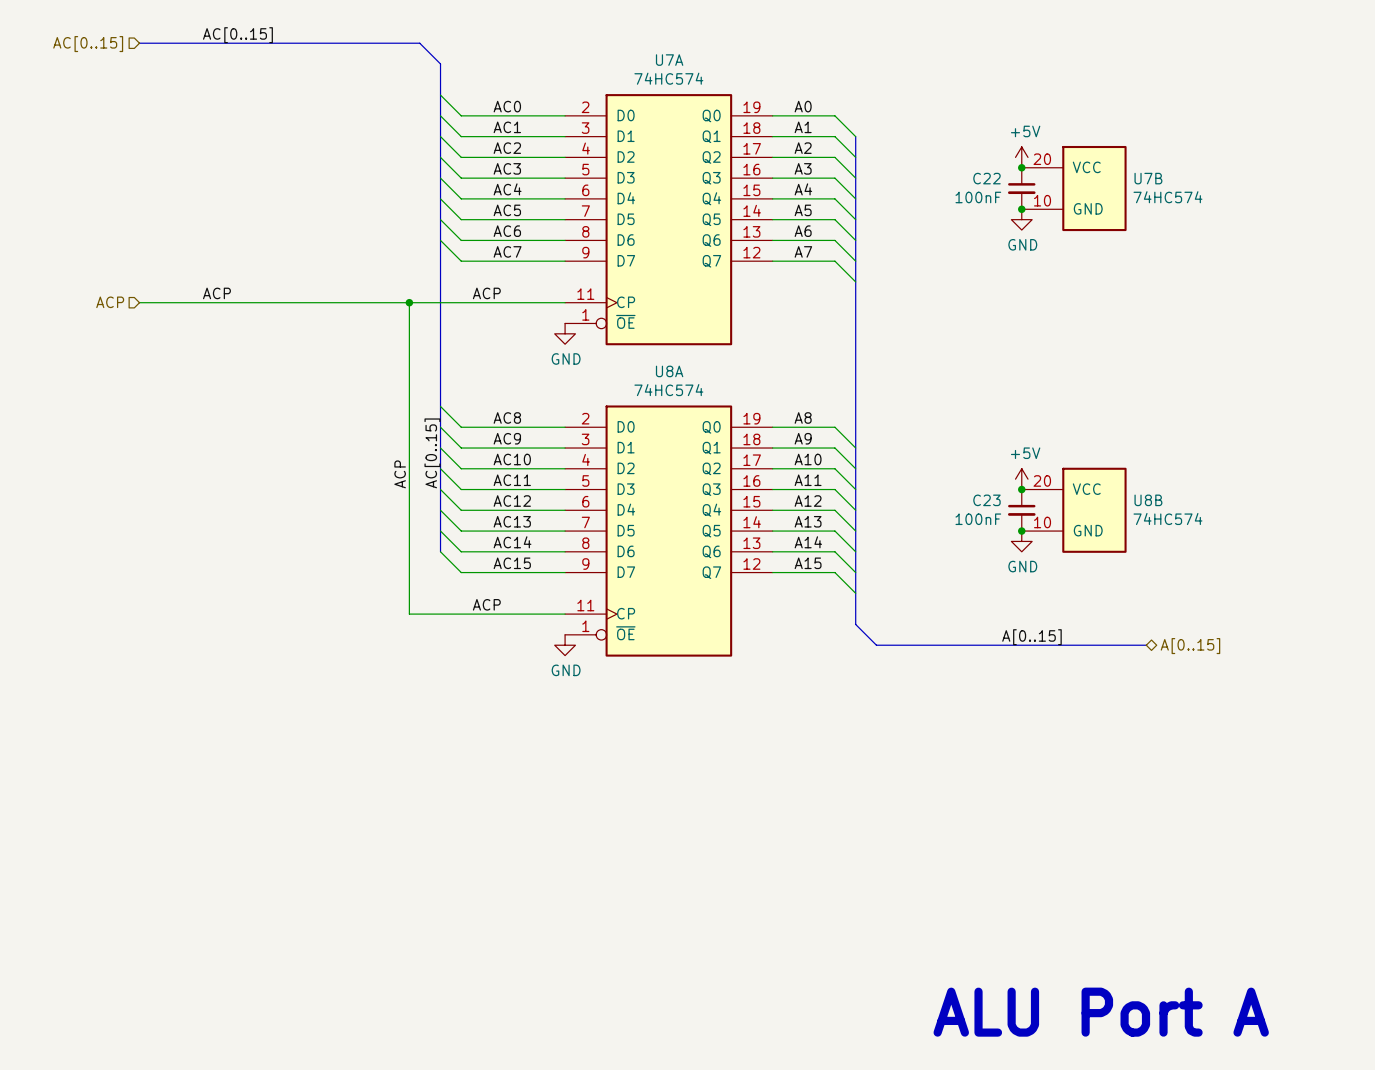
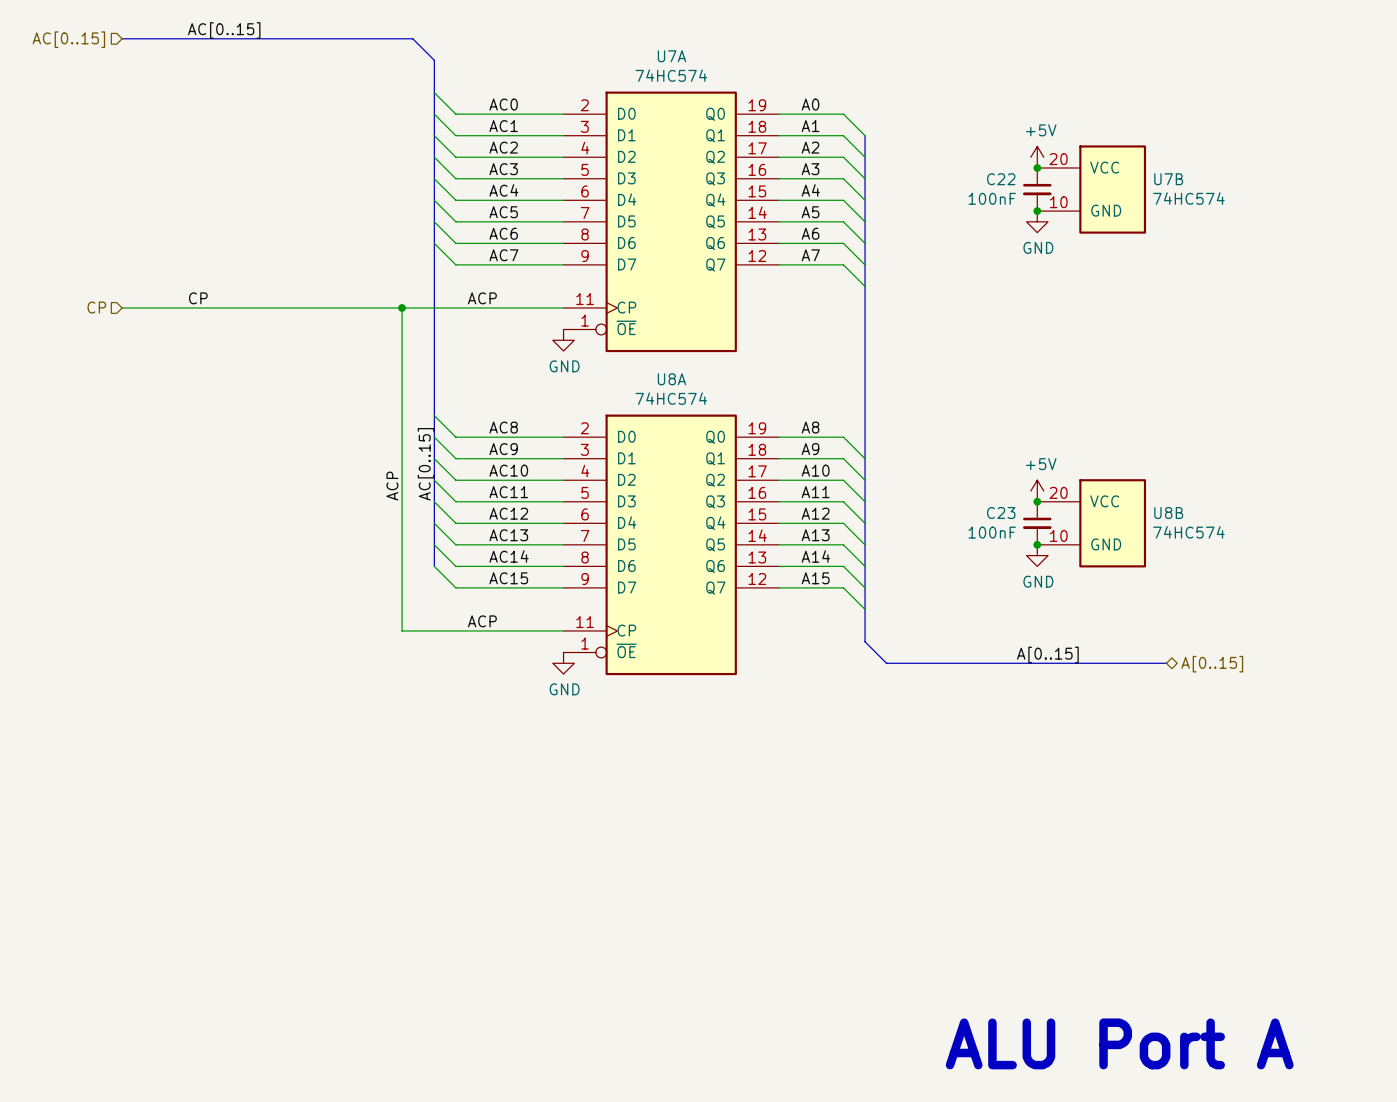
label: ACP (216, 293) -> CP (198, 298)
hierarchical label: ACP (110, 302) -> CP (96, 307)

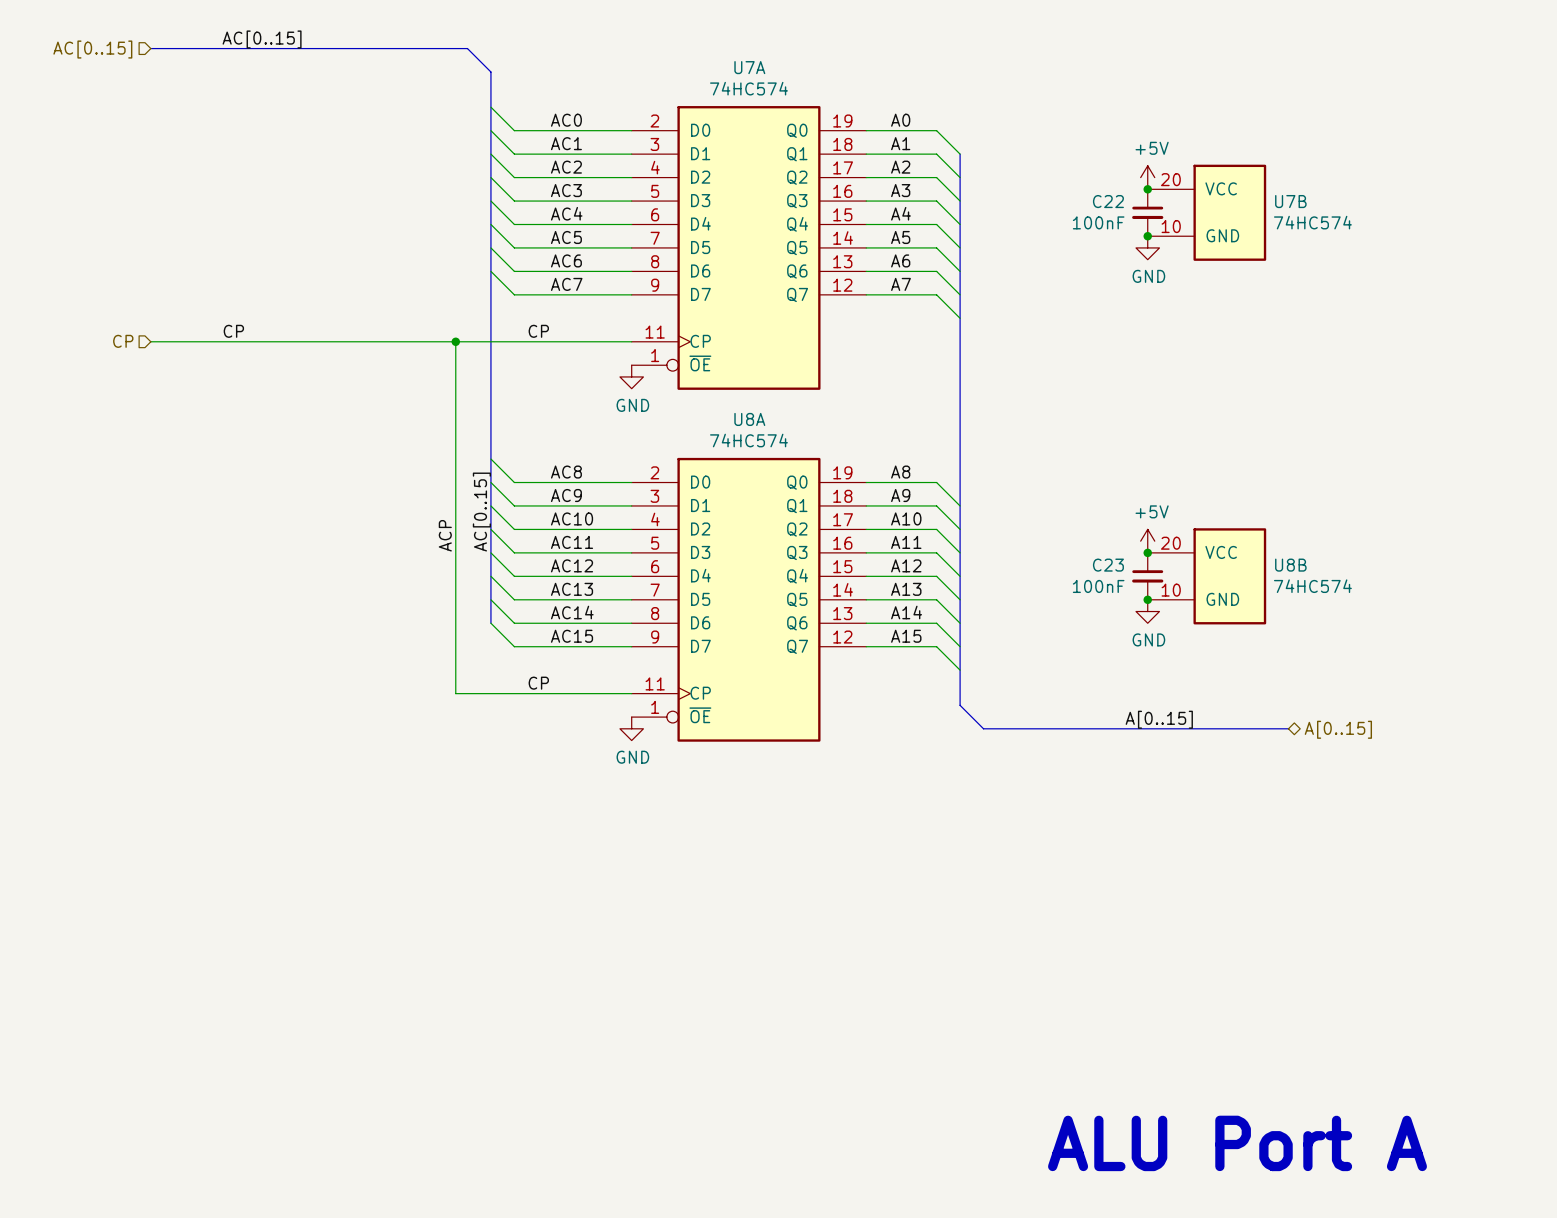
label: ACP (482, 298) -> CP (538, 331)
label: ACP (482, 621) -> CP (538, 683)

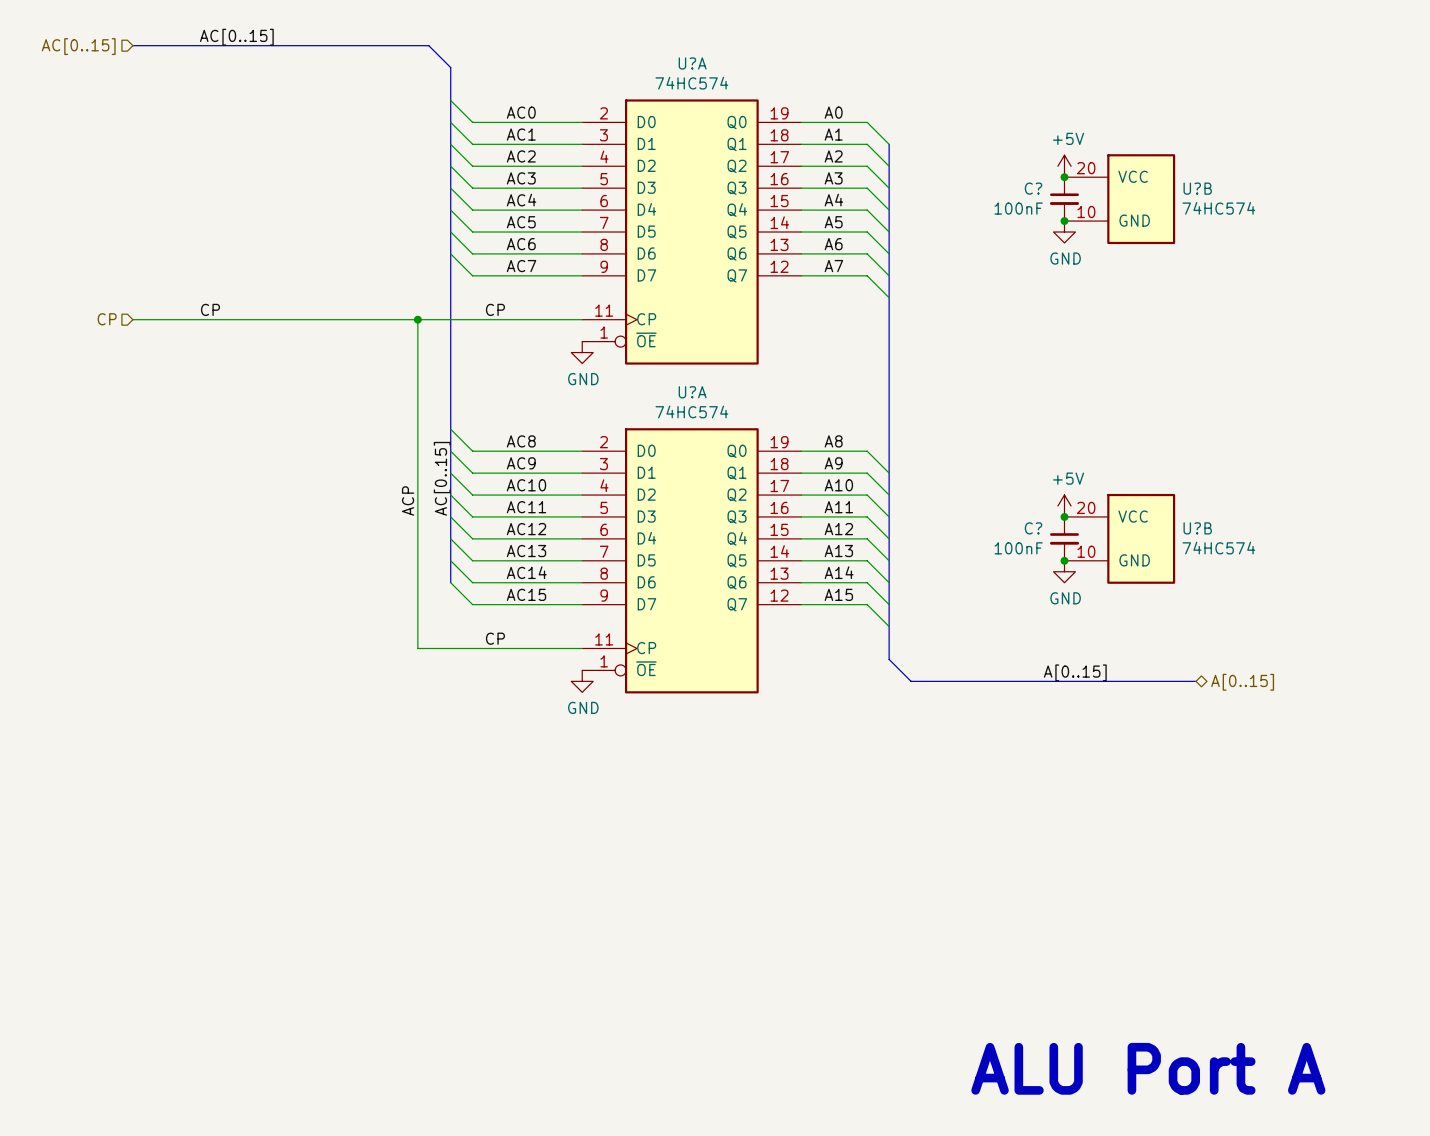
U7A name: U7A (749, 67) -> U?A (692, 63)
C22 name: C22 (1108, 201) -> C? (1033, 188)
U7B name: U7B (1290, 201) -> U?B (1197, 188)
U8A name: U8A (749, 419) -> U?A (692, 392)
C23 name: C23 (1108, 565) -> C? (1033, 528)
U8B name: U8B (1290, 565) -> U?B (1197, 528)

